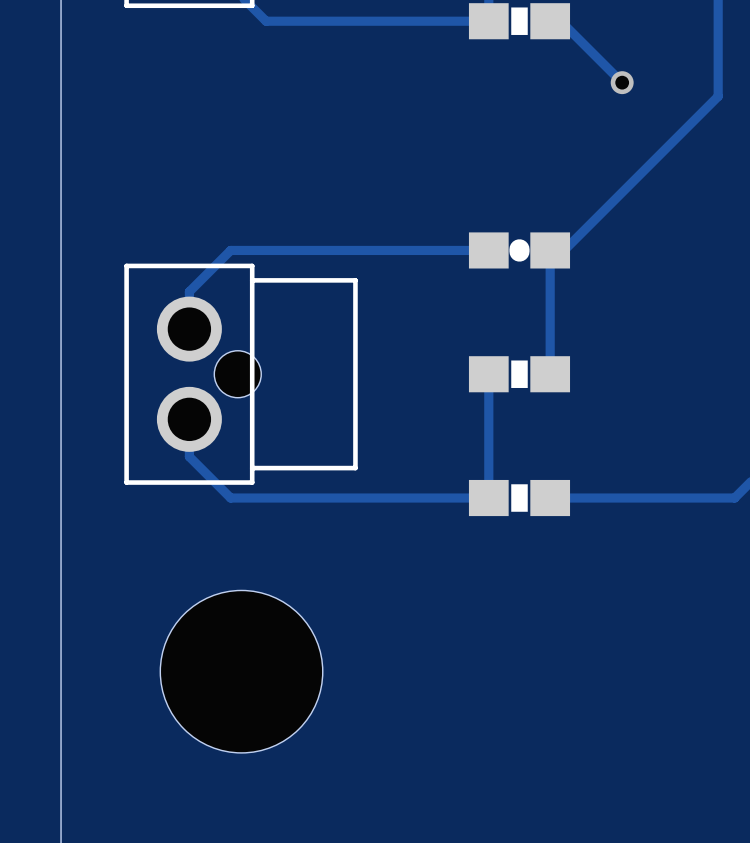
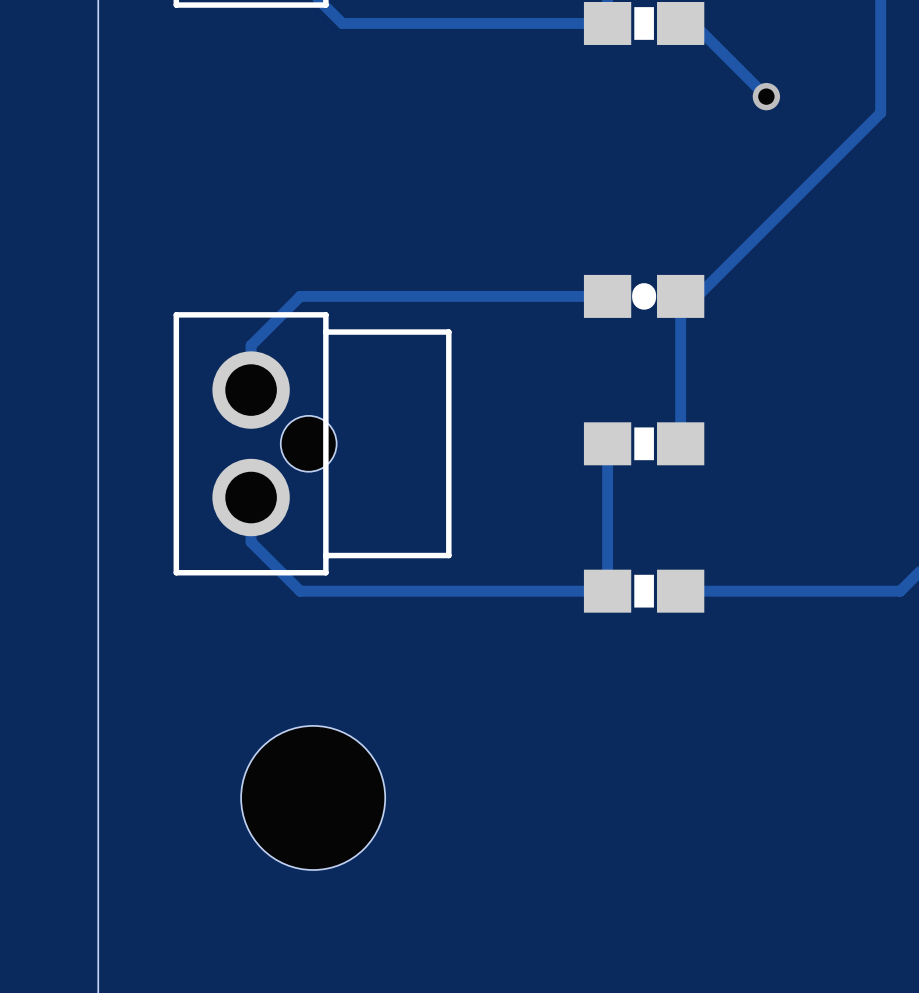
part footprint: [160, 590, 323, 753] -> [241, 725, 386, 871]

